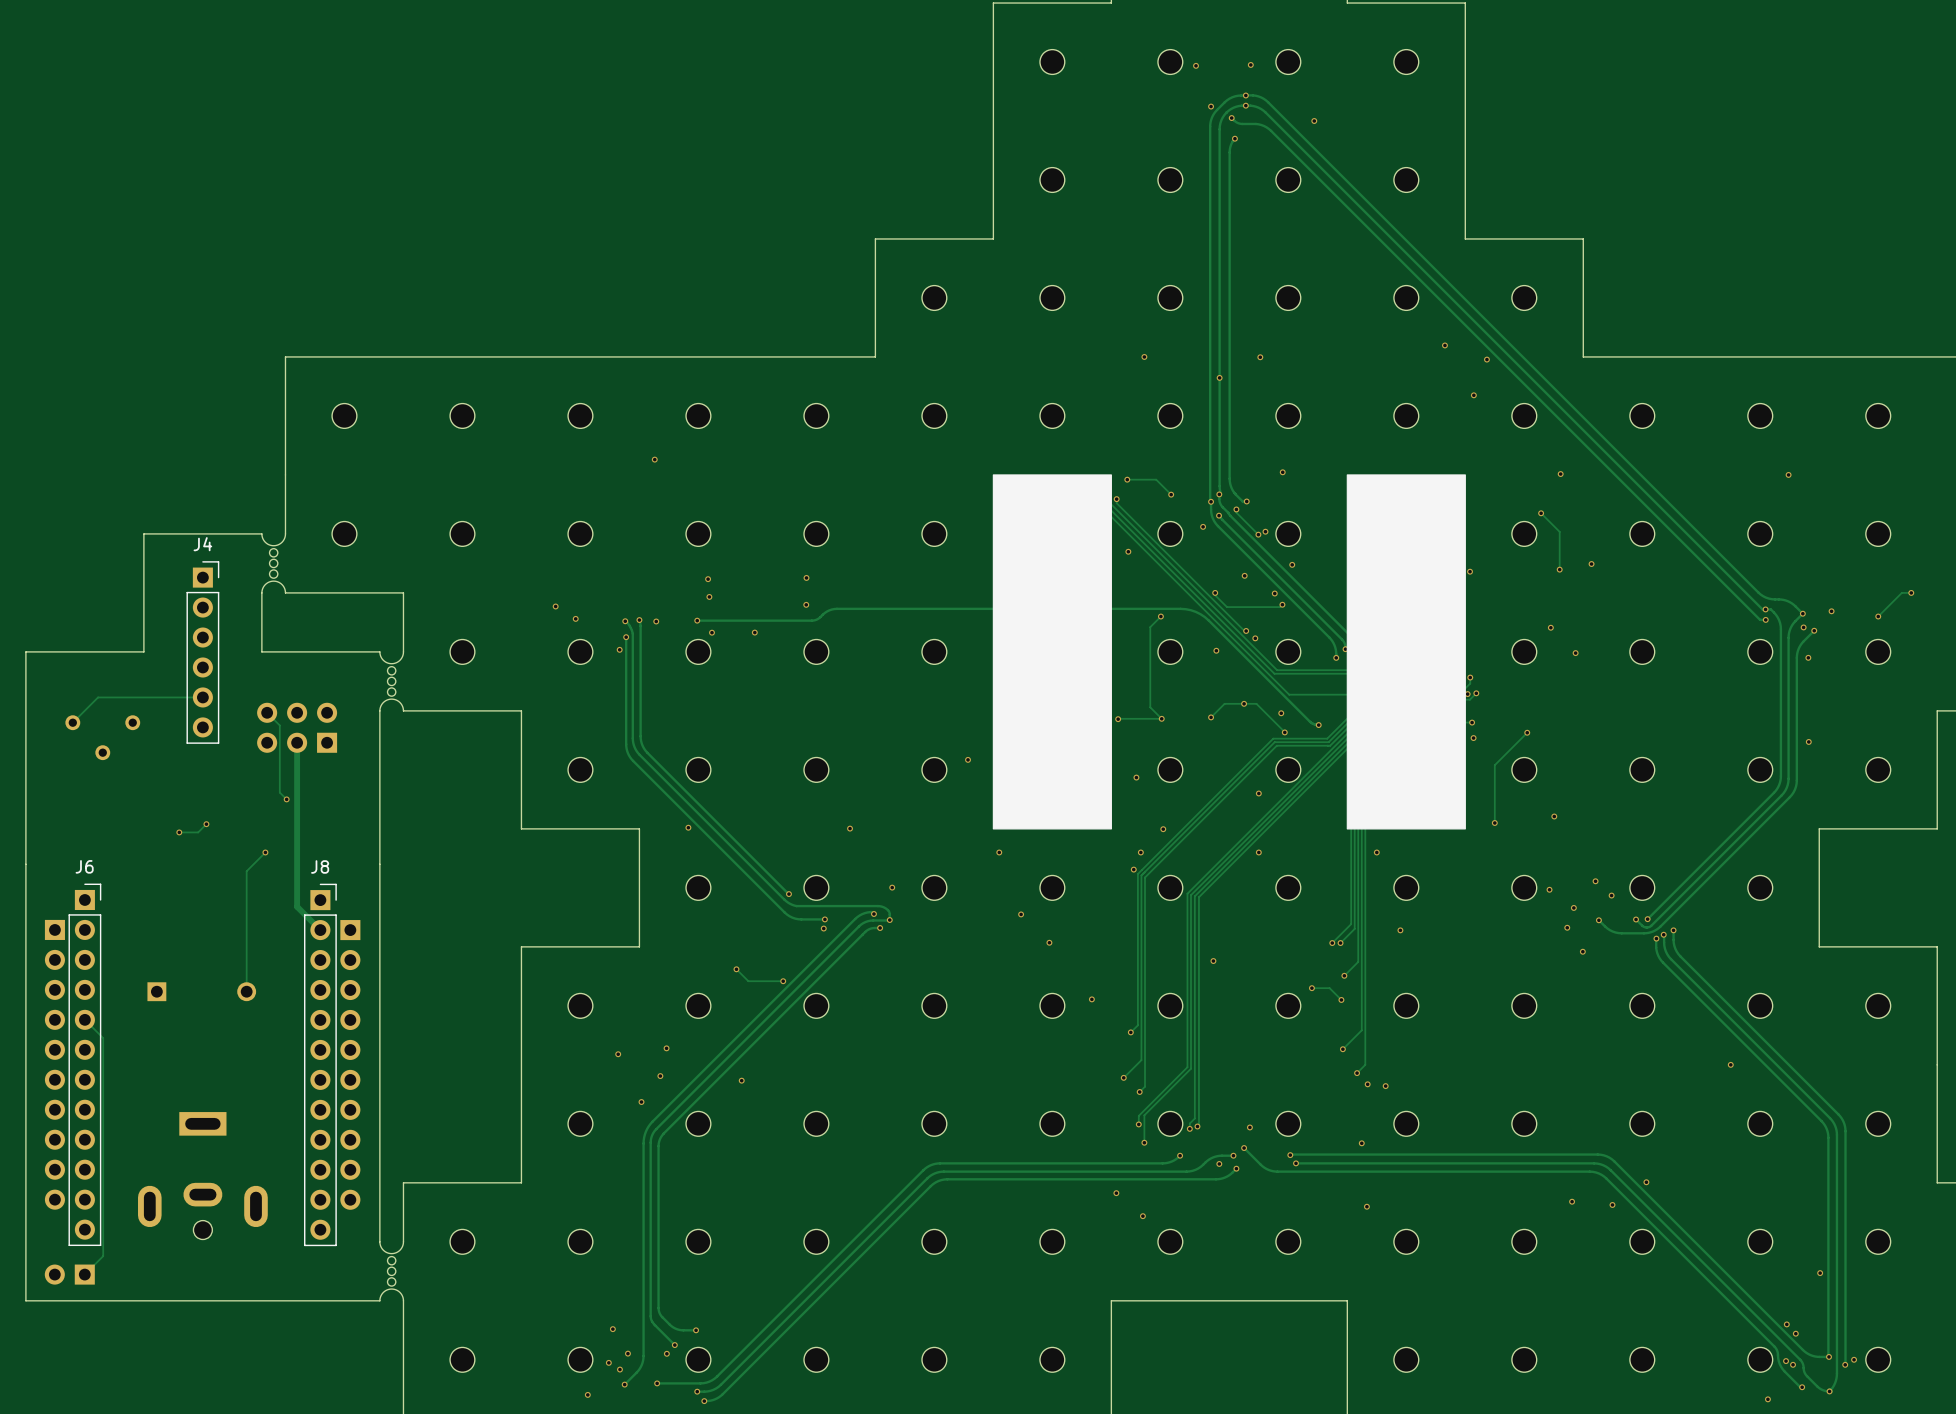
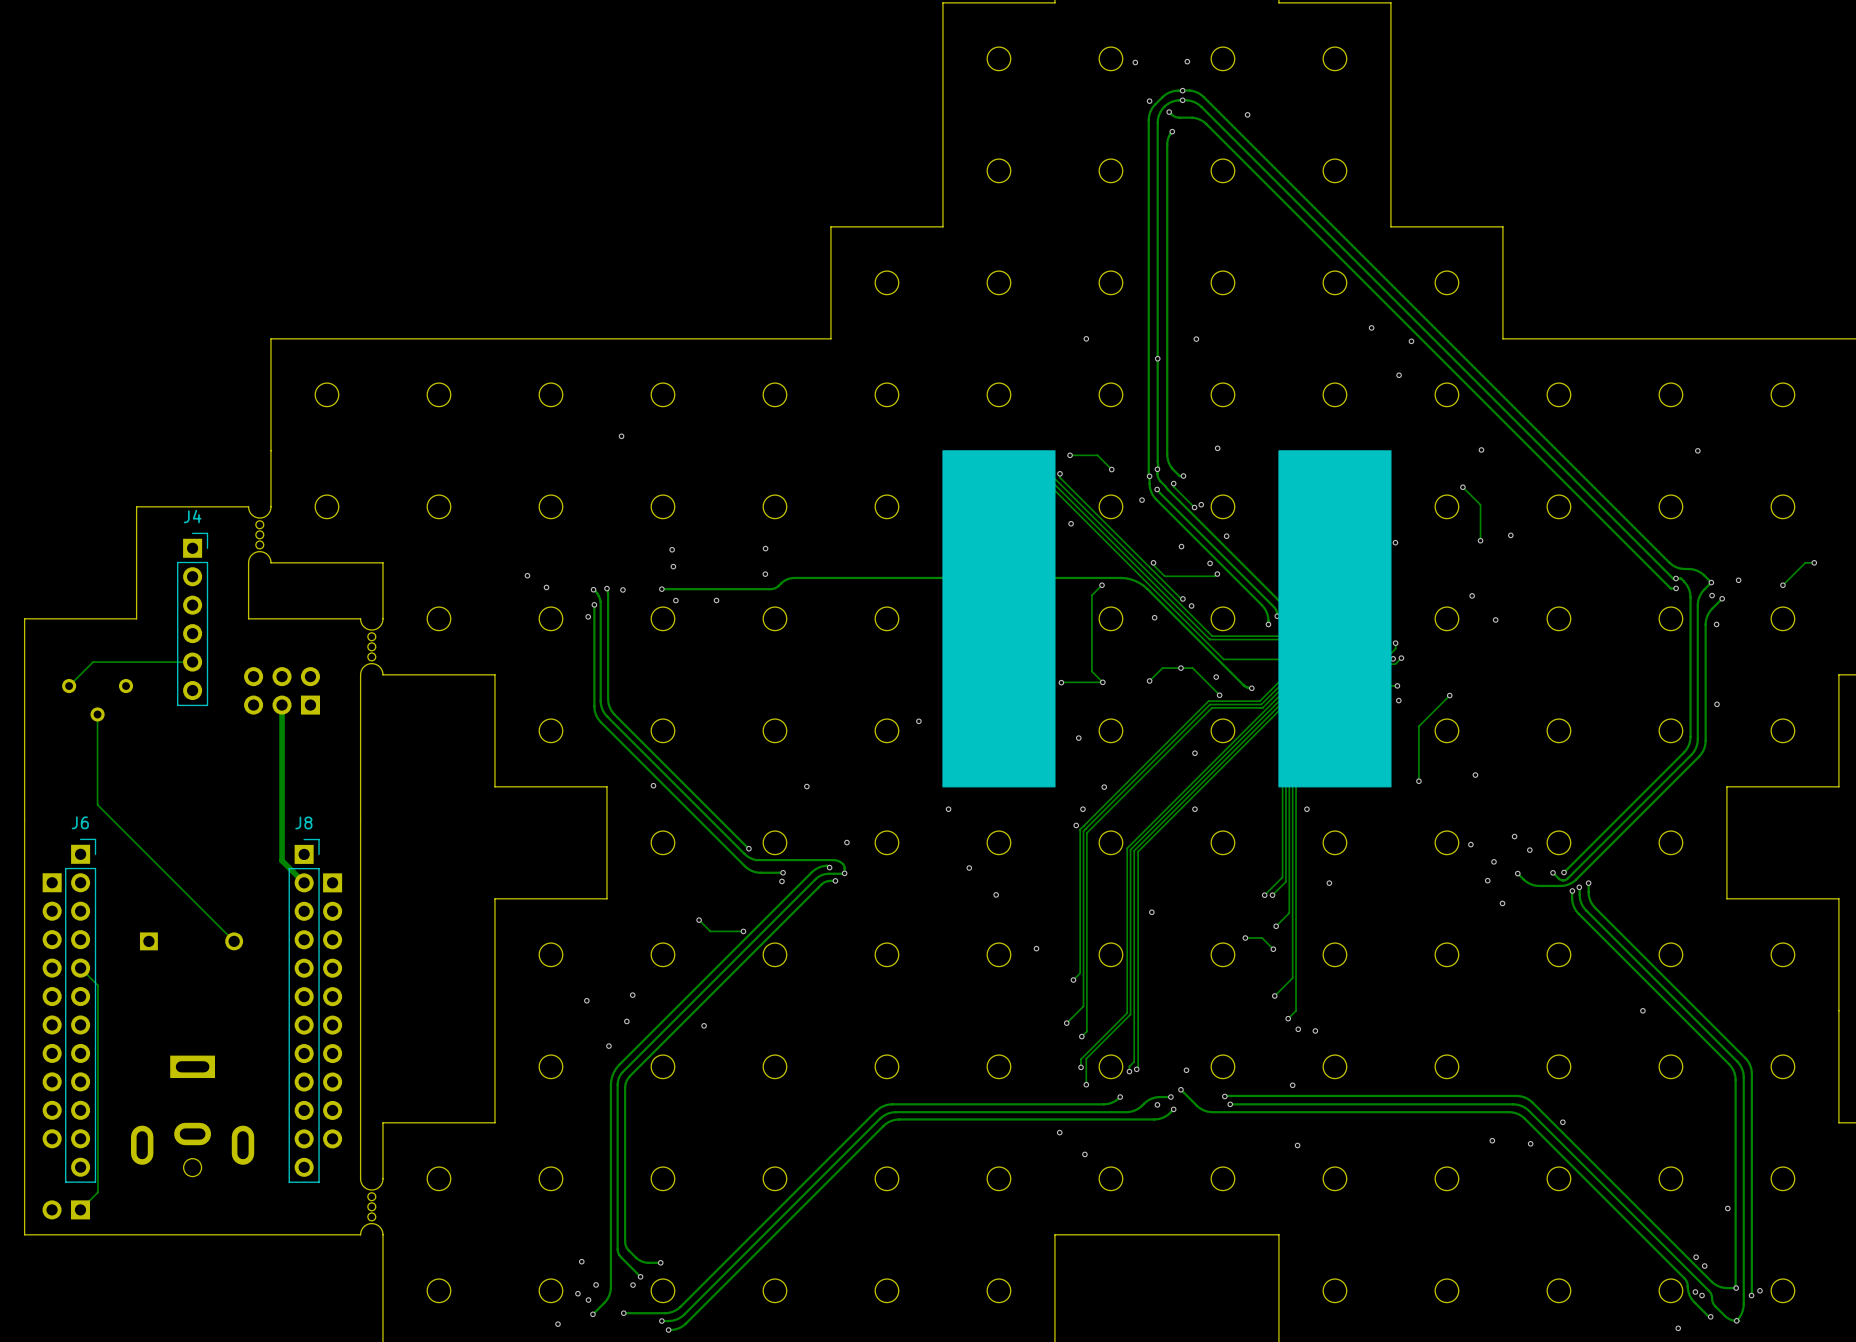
track: (267, 712) (279, 725) (279, 792) (286, 799) -> none
via: (286, 799) -> none
track: (206, 824) (198, 832) (179, 832) -> none
via: (206, 824) -> none
via: (179, 832) -> none
track: (265, 852) (246, 871) (246, 991) -> (97, 714) (97, 804) (234, 941)
via: (265, 852) -> none

